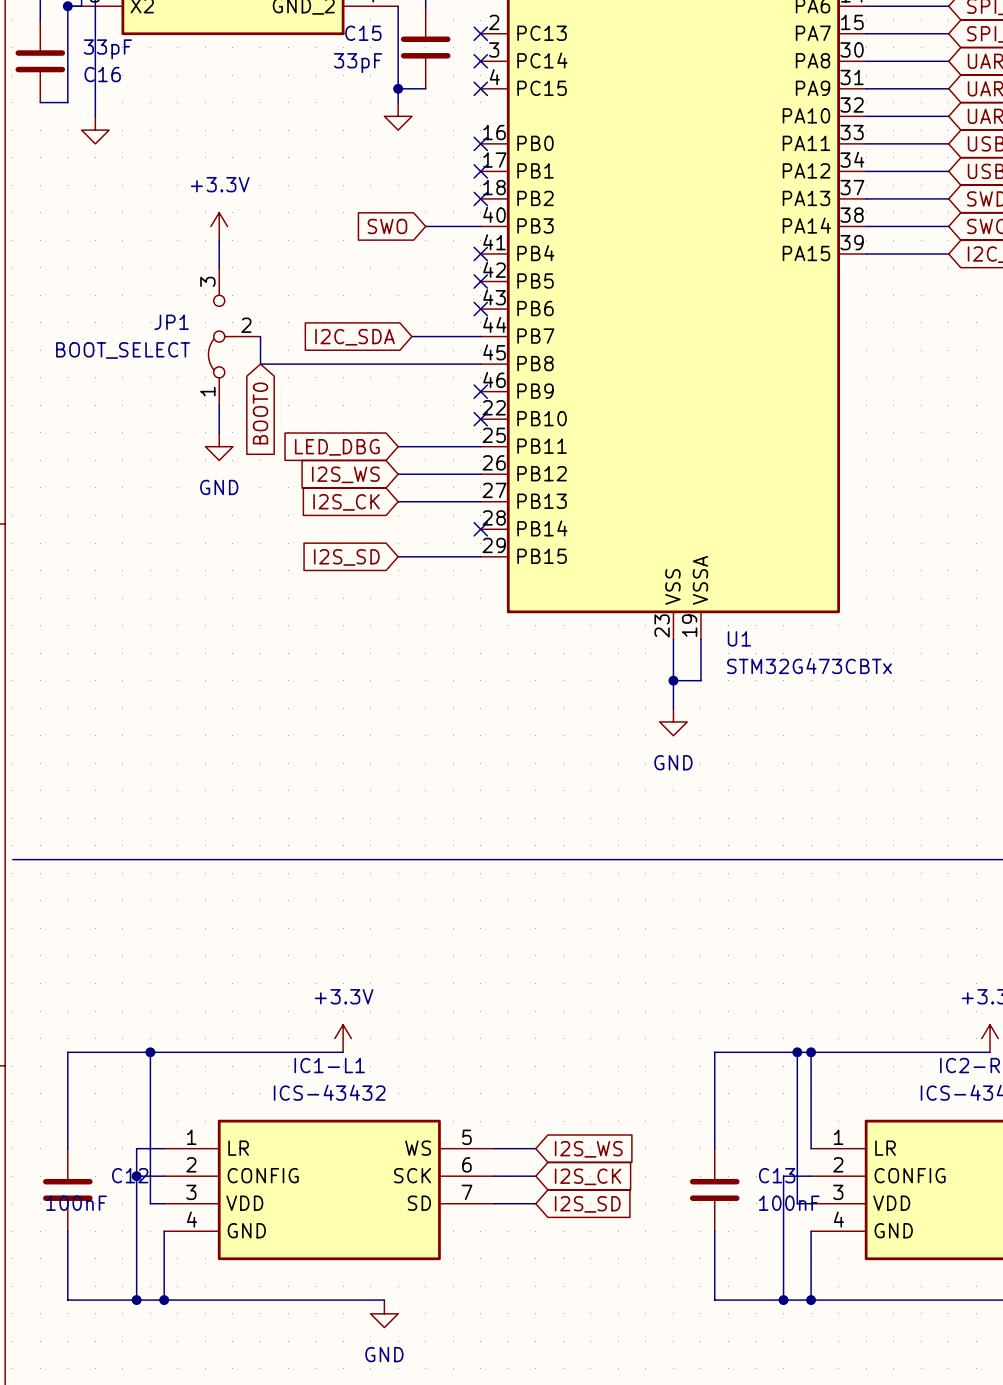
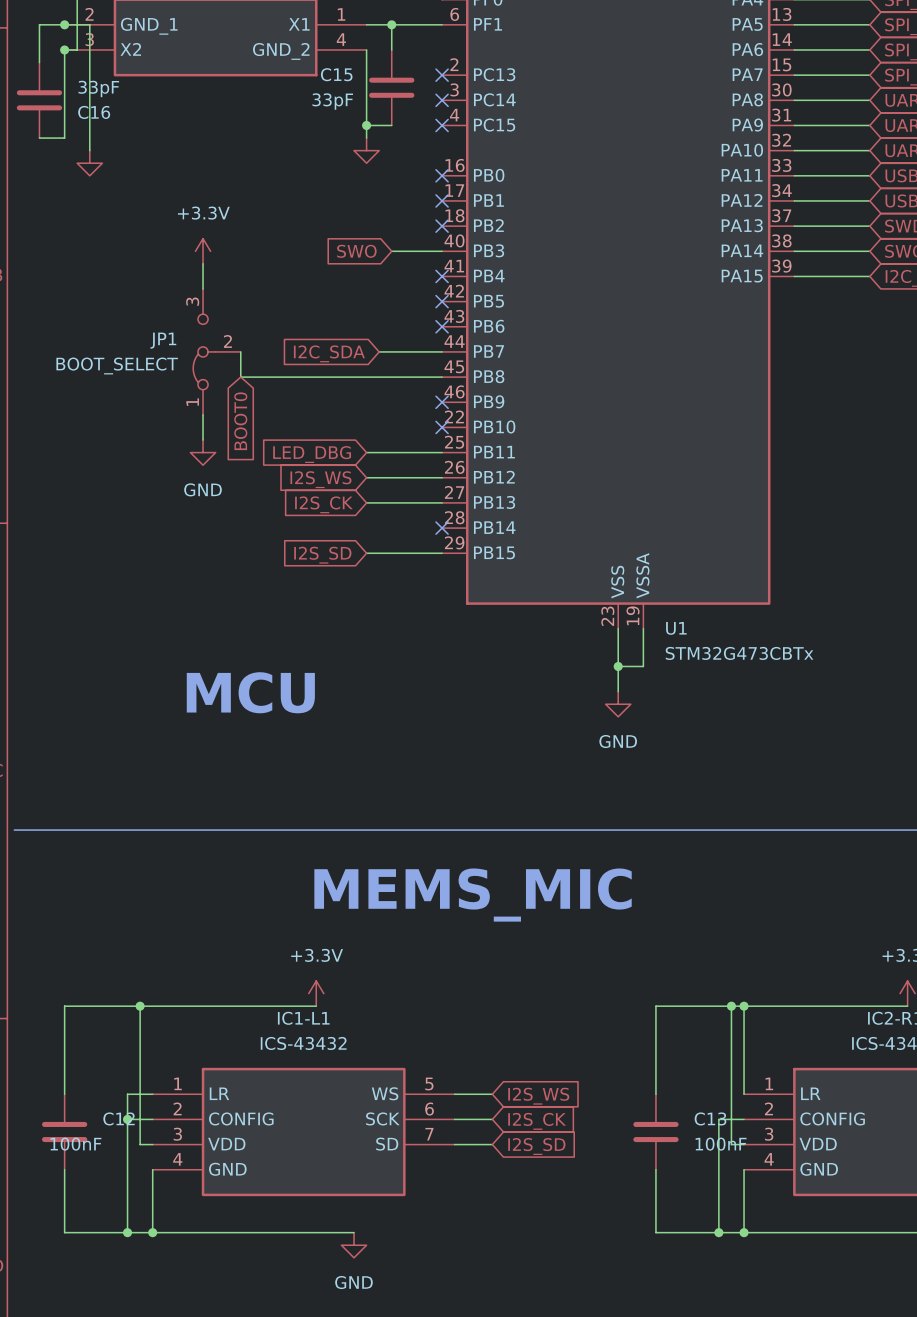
text: none -> MCU (250, 692)
text: none -> MEMS_MIC (473, 895)

